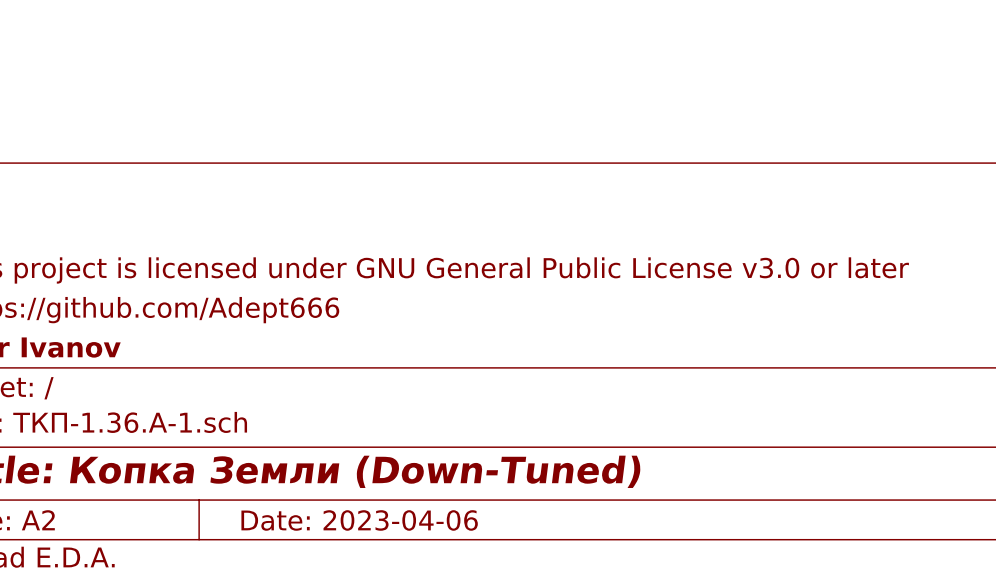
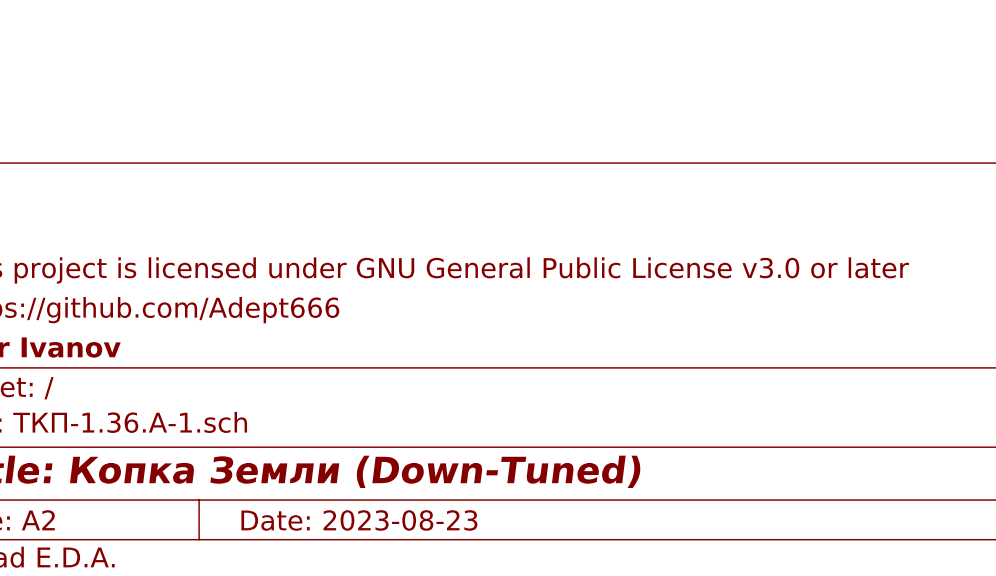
title block: Date: 2023-04-06 (359, 520) -> Date: 2023-08-23 (359, 520)

